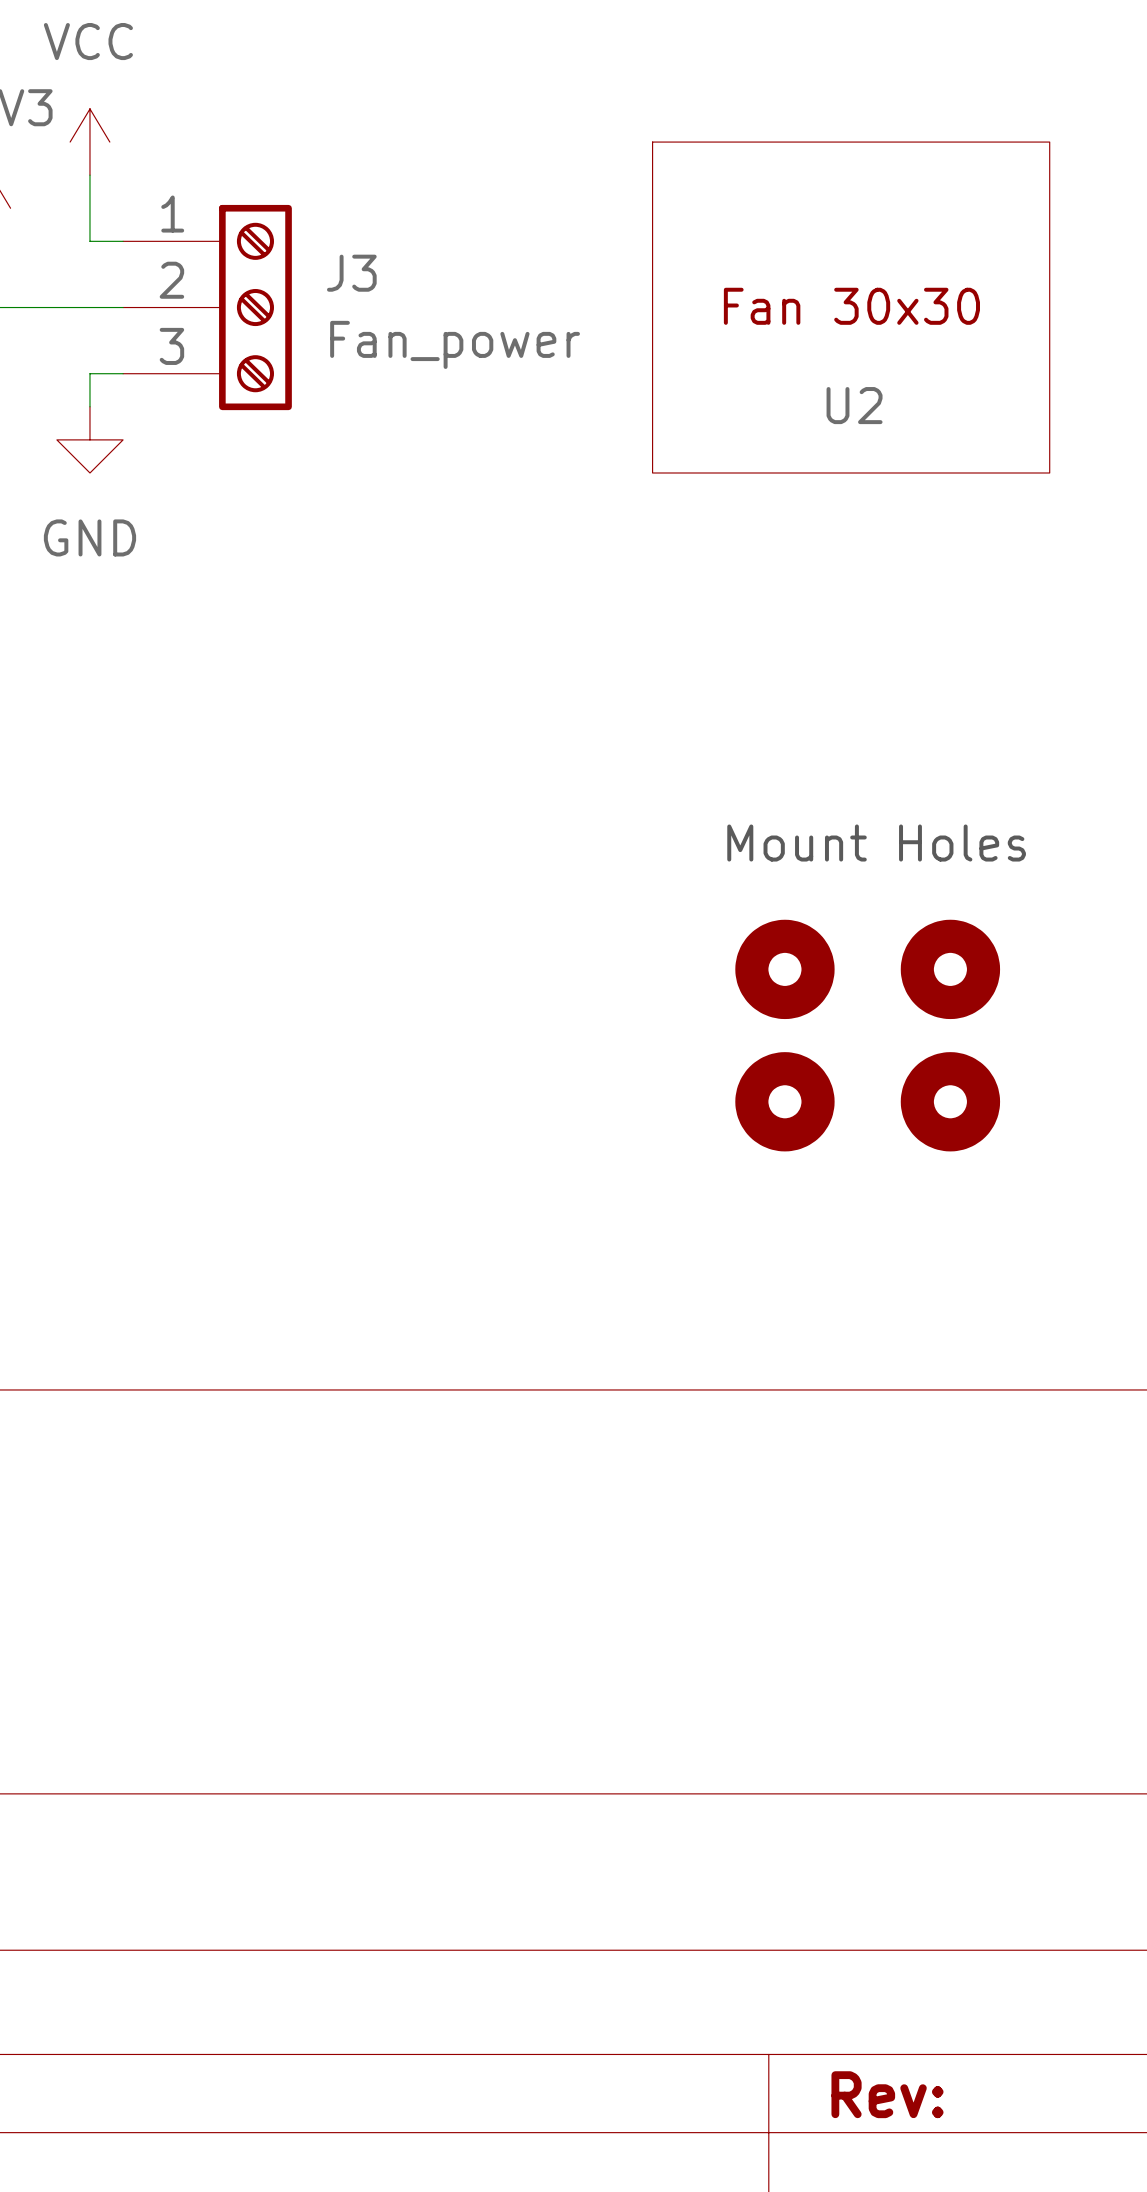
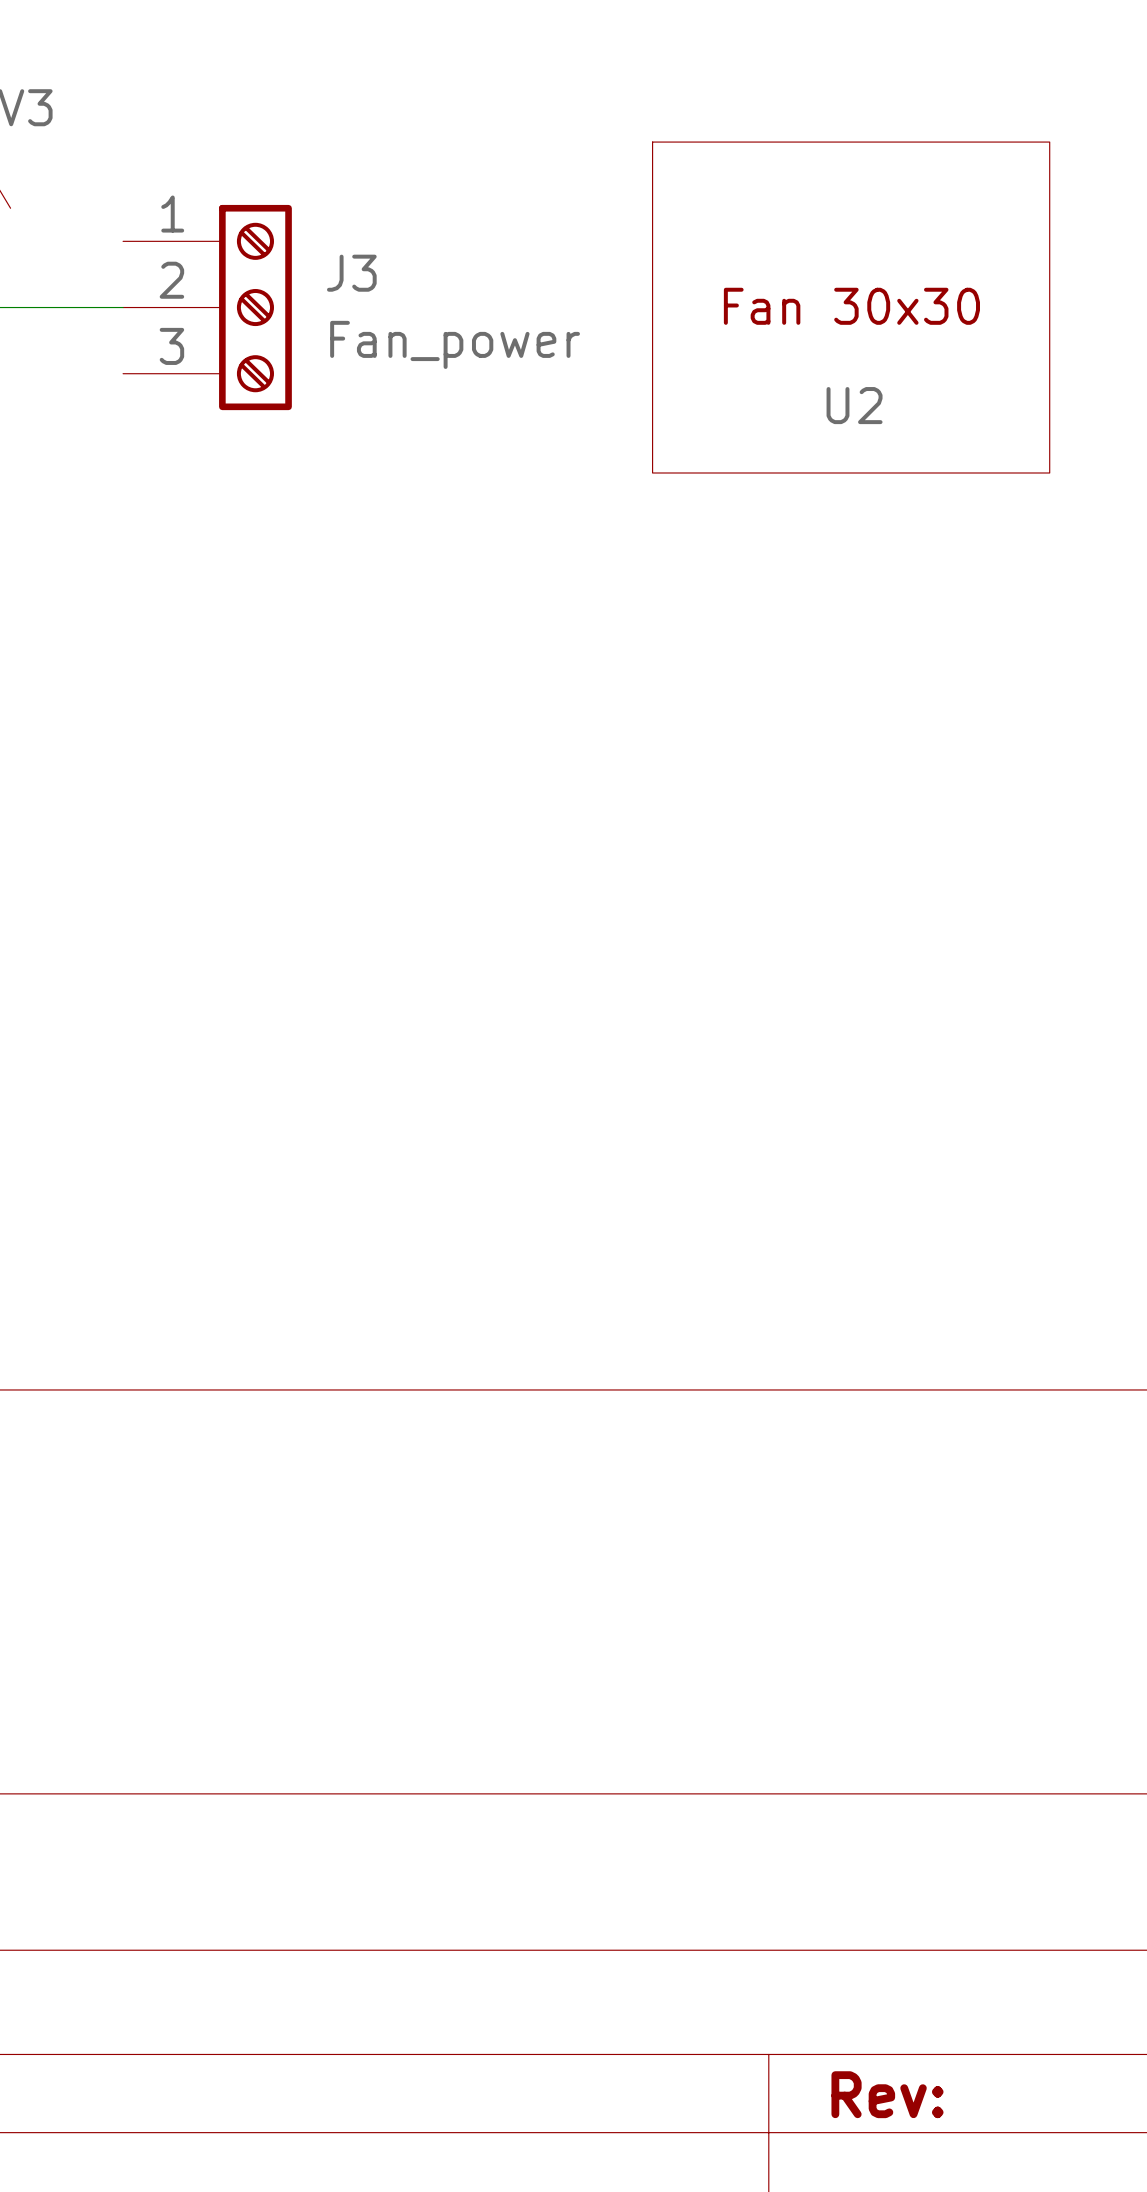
power symbol: VCC (89, 142) -> none
wire: (89, 175) (89, 241) (123, 241) -> none
wire: (123, 373) (89, 373) (89, 406) -> none
power symbol: GND (89, 439) -> none
text: Mount Holes (876, 843) -> none
part: (784, 969) -> none
part: (950, 969) -> none
part: (784, 1101) -> none
part: (950, 1101) -> none

